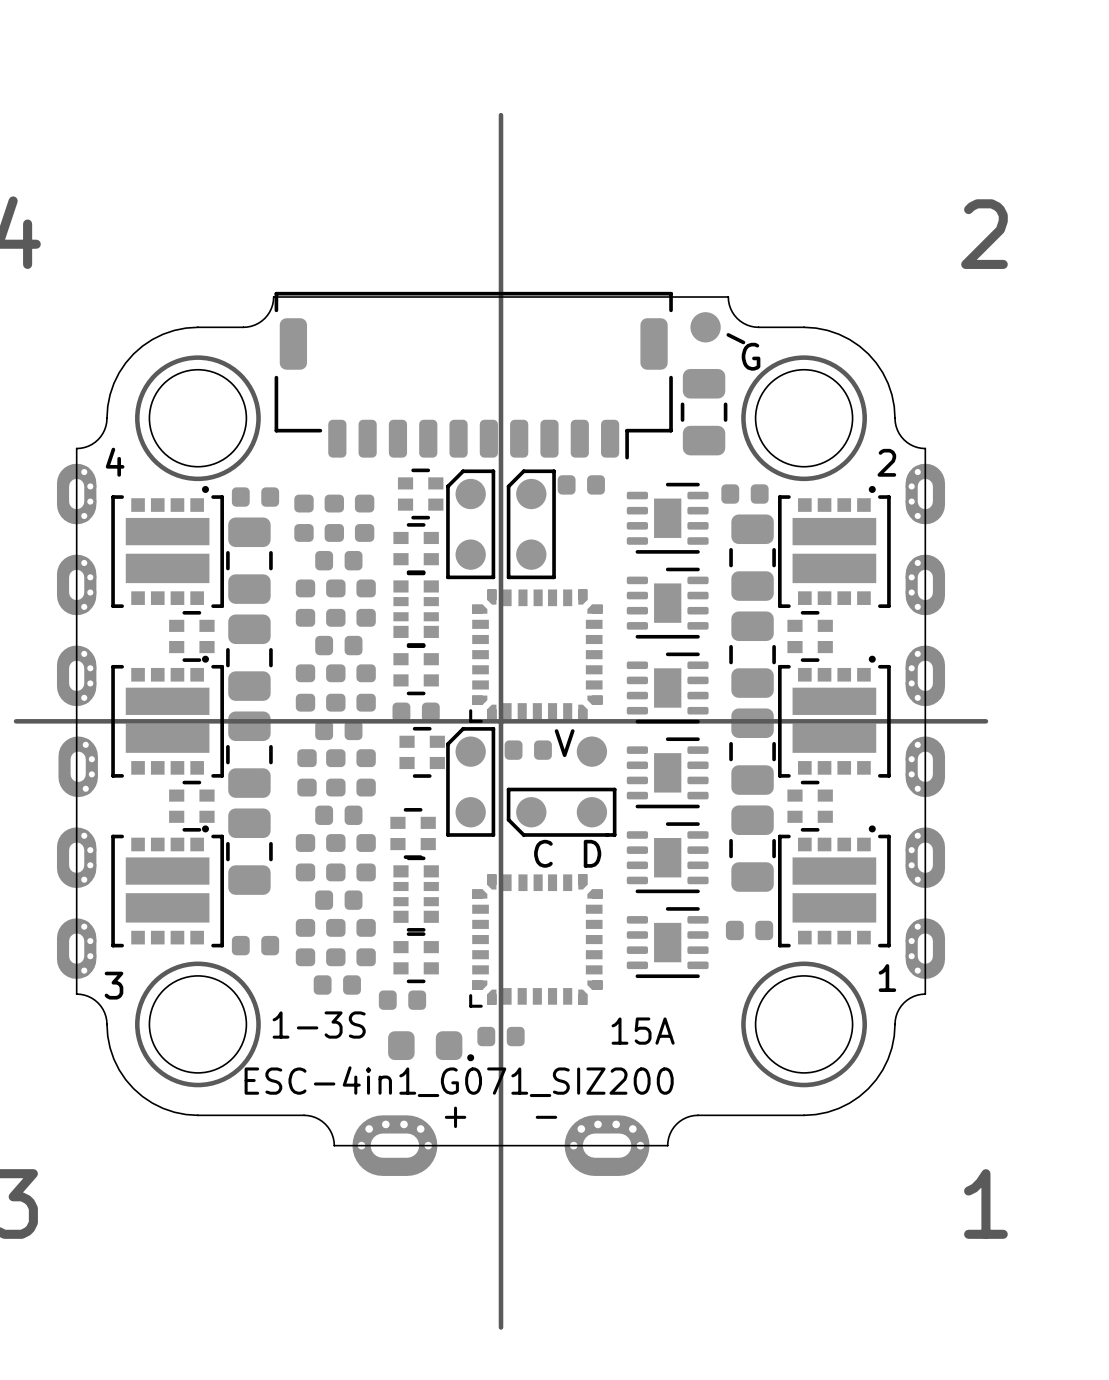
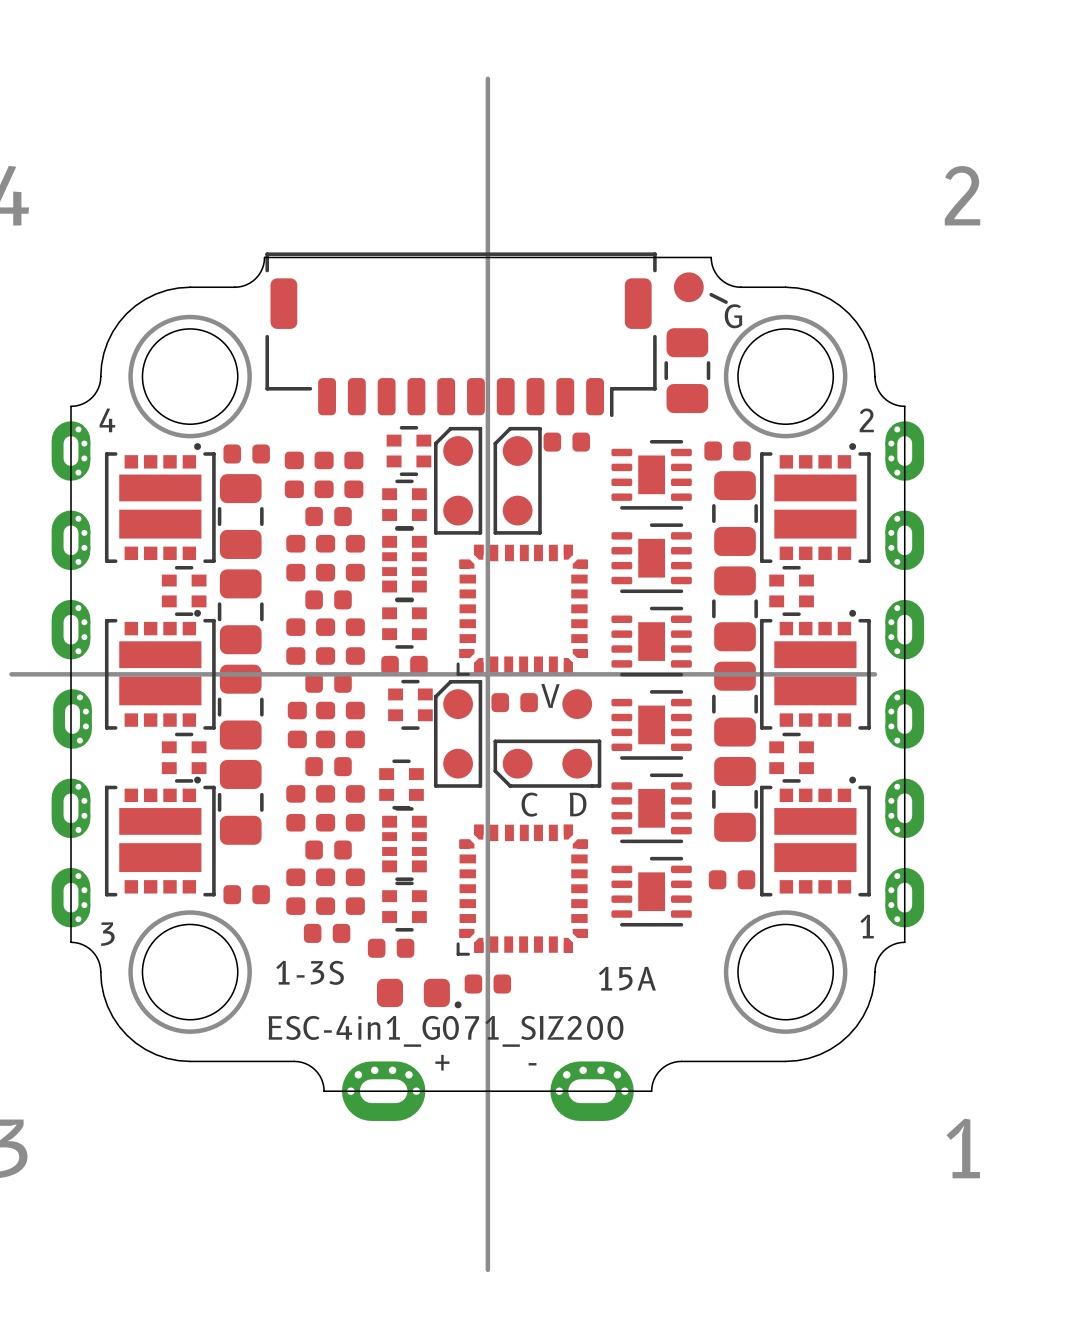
line: (895, 721) (985, 721) -> none

